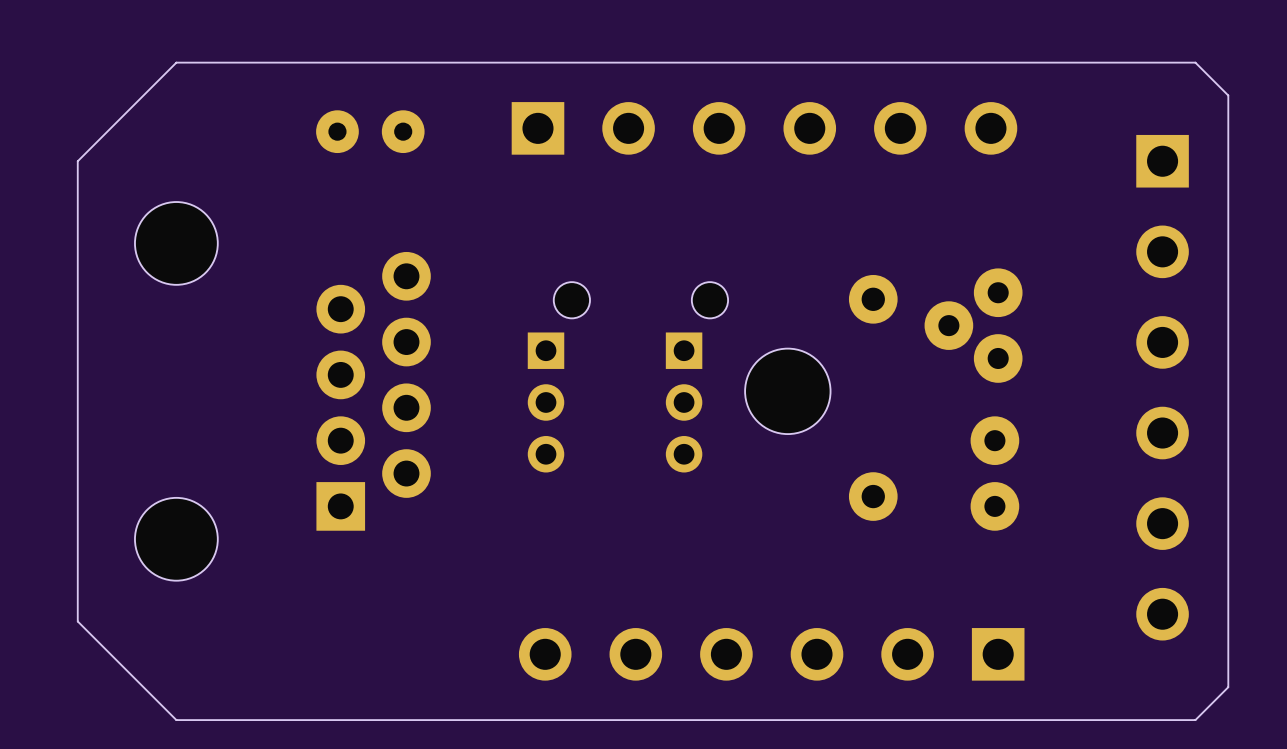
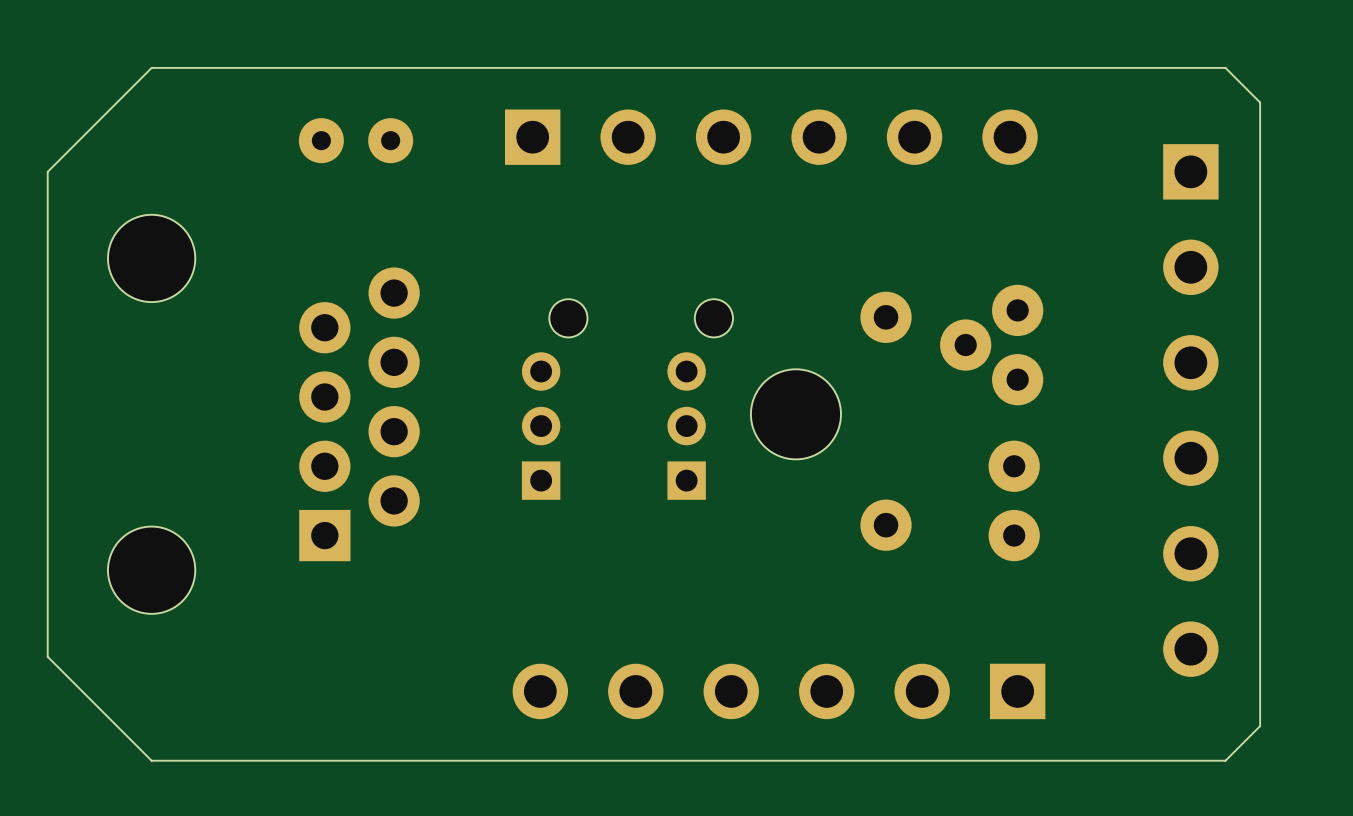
part footprint: [527, 282, 591, 473] -> [521, 299, 588, 500]
part footprint: [665, 282, 729, 473] -> [667, 299, 734, 500]

